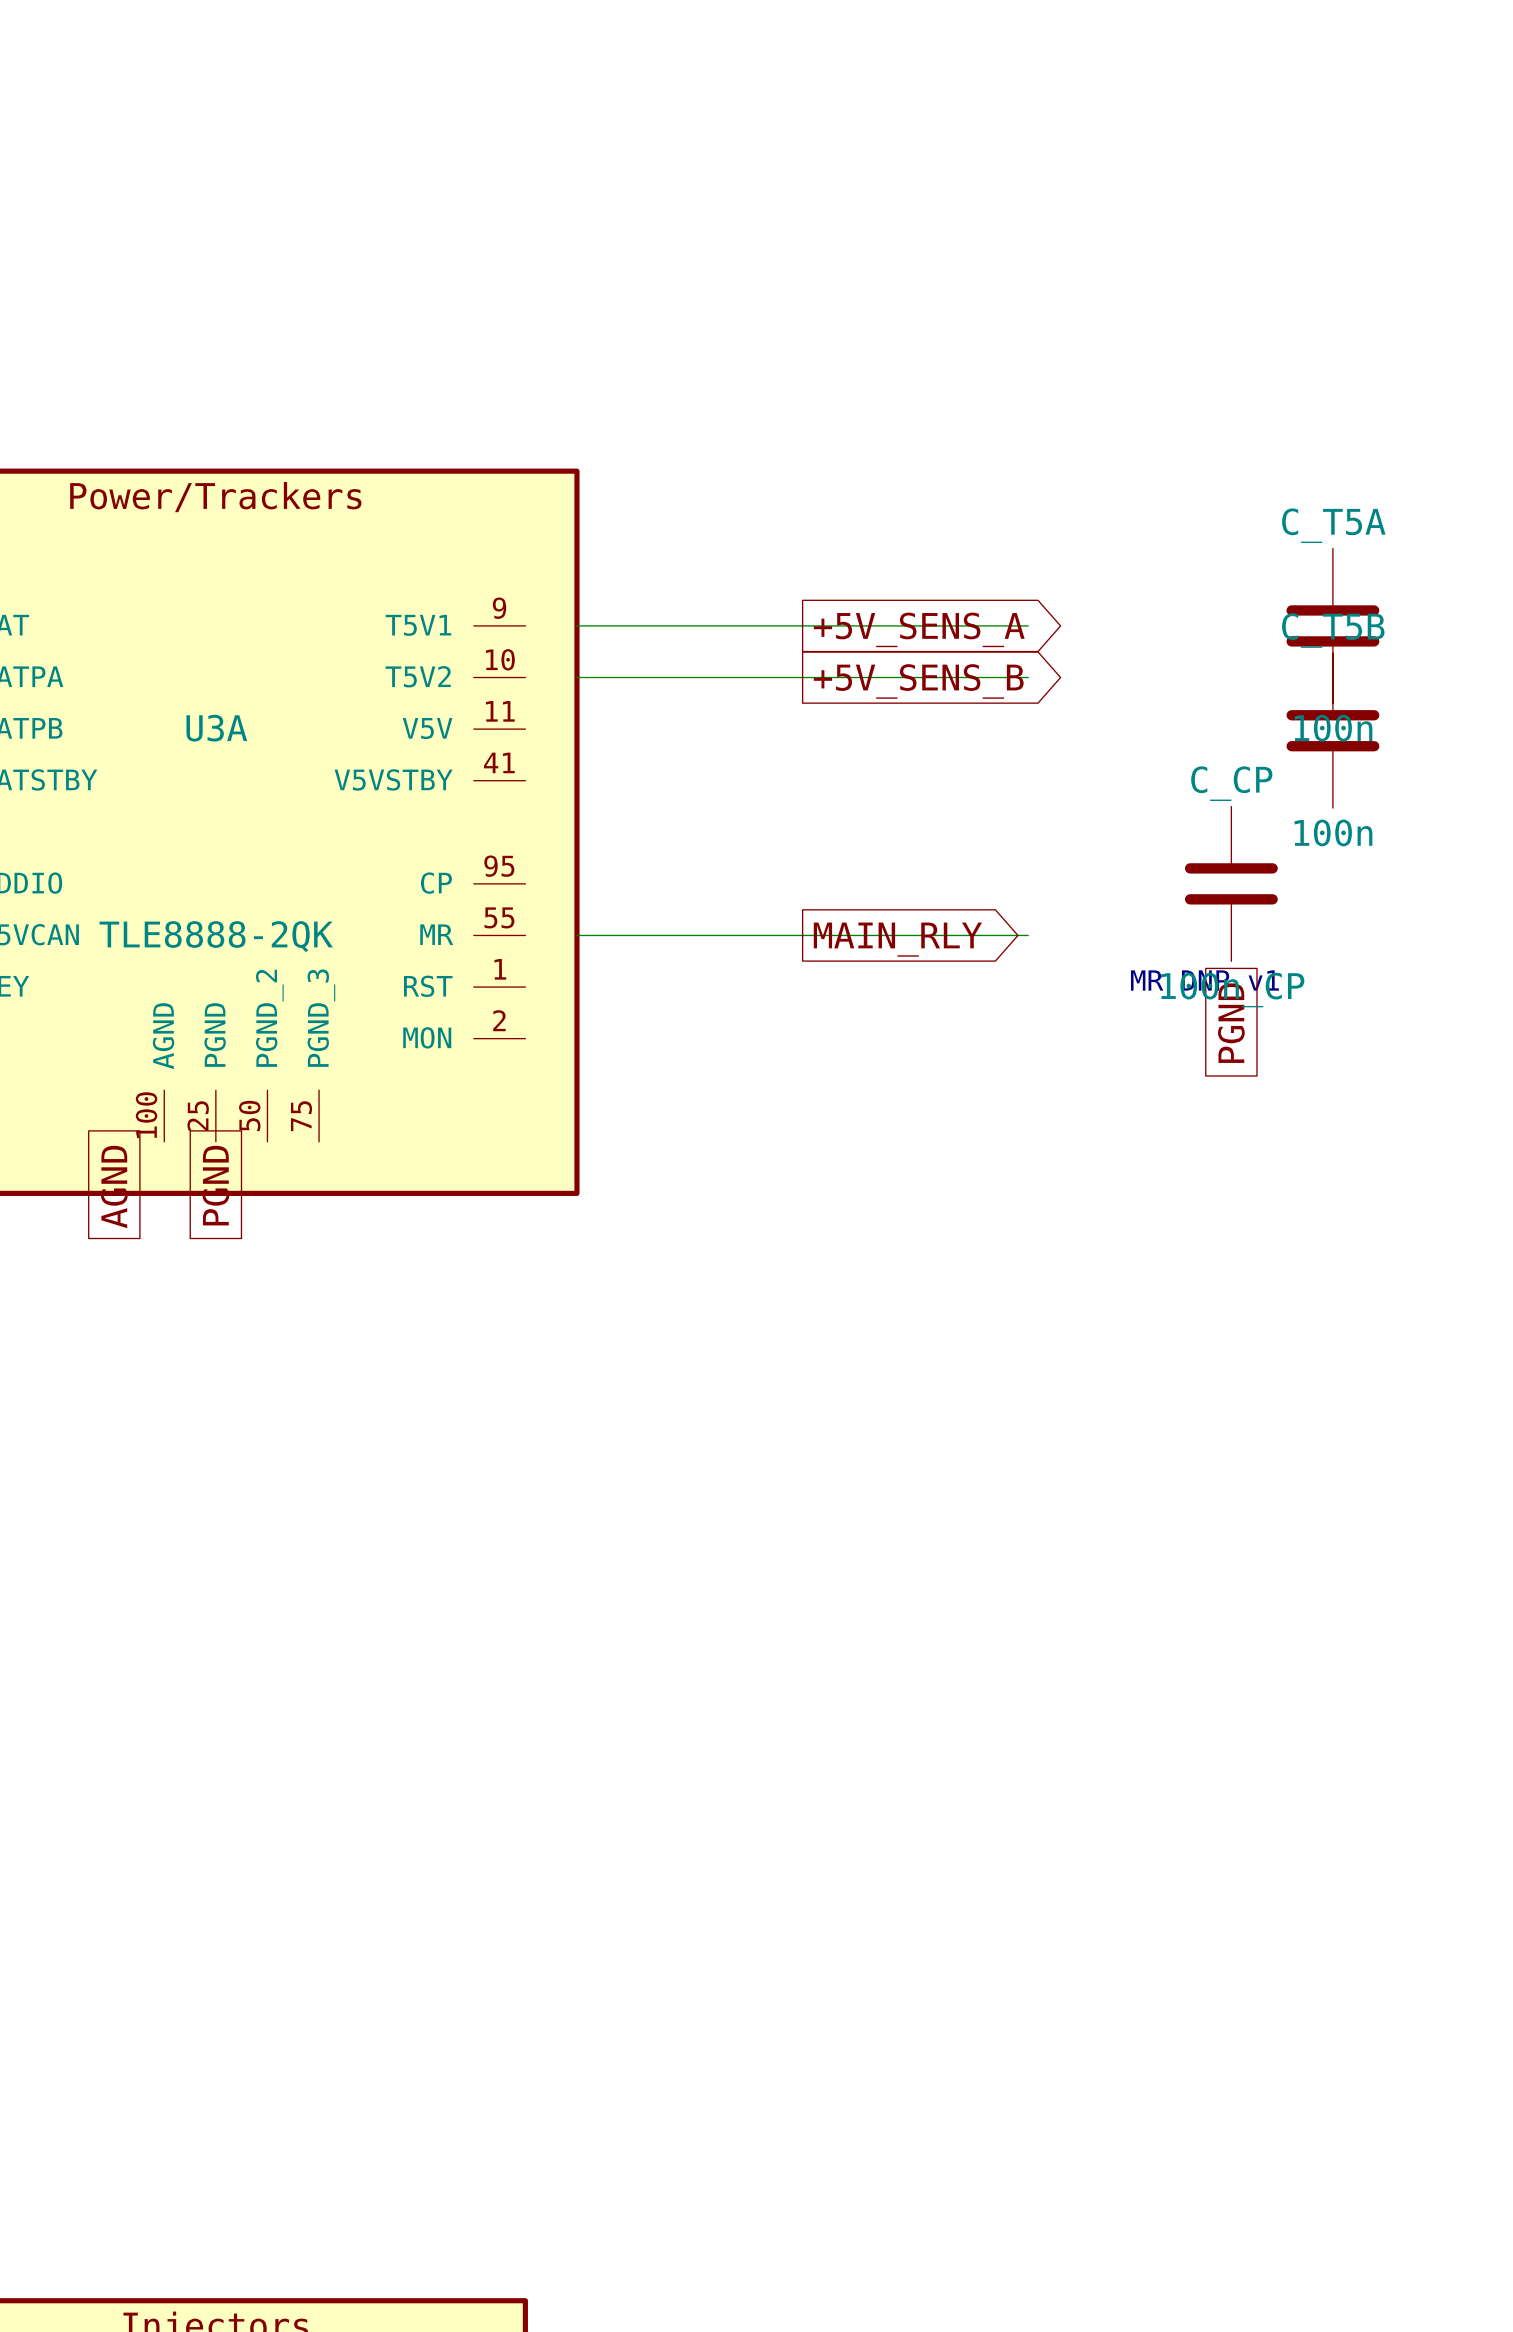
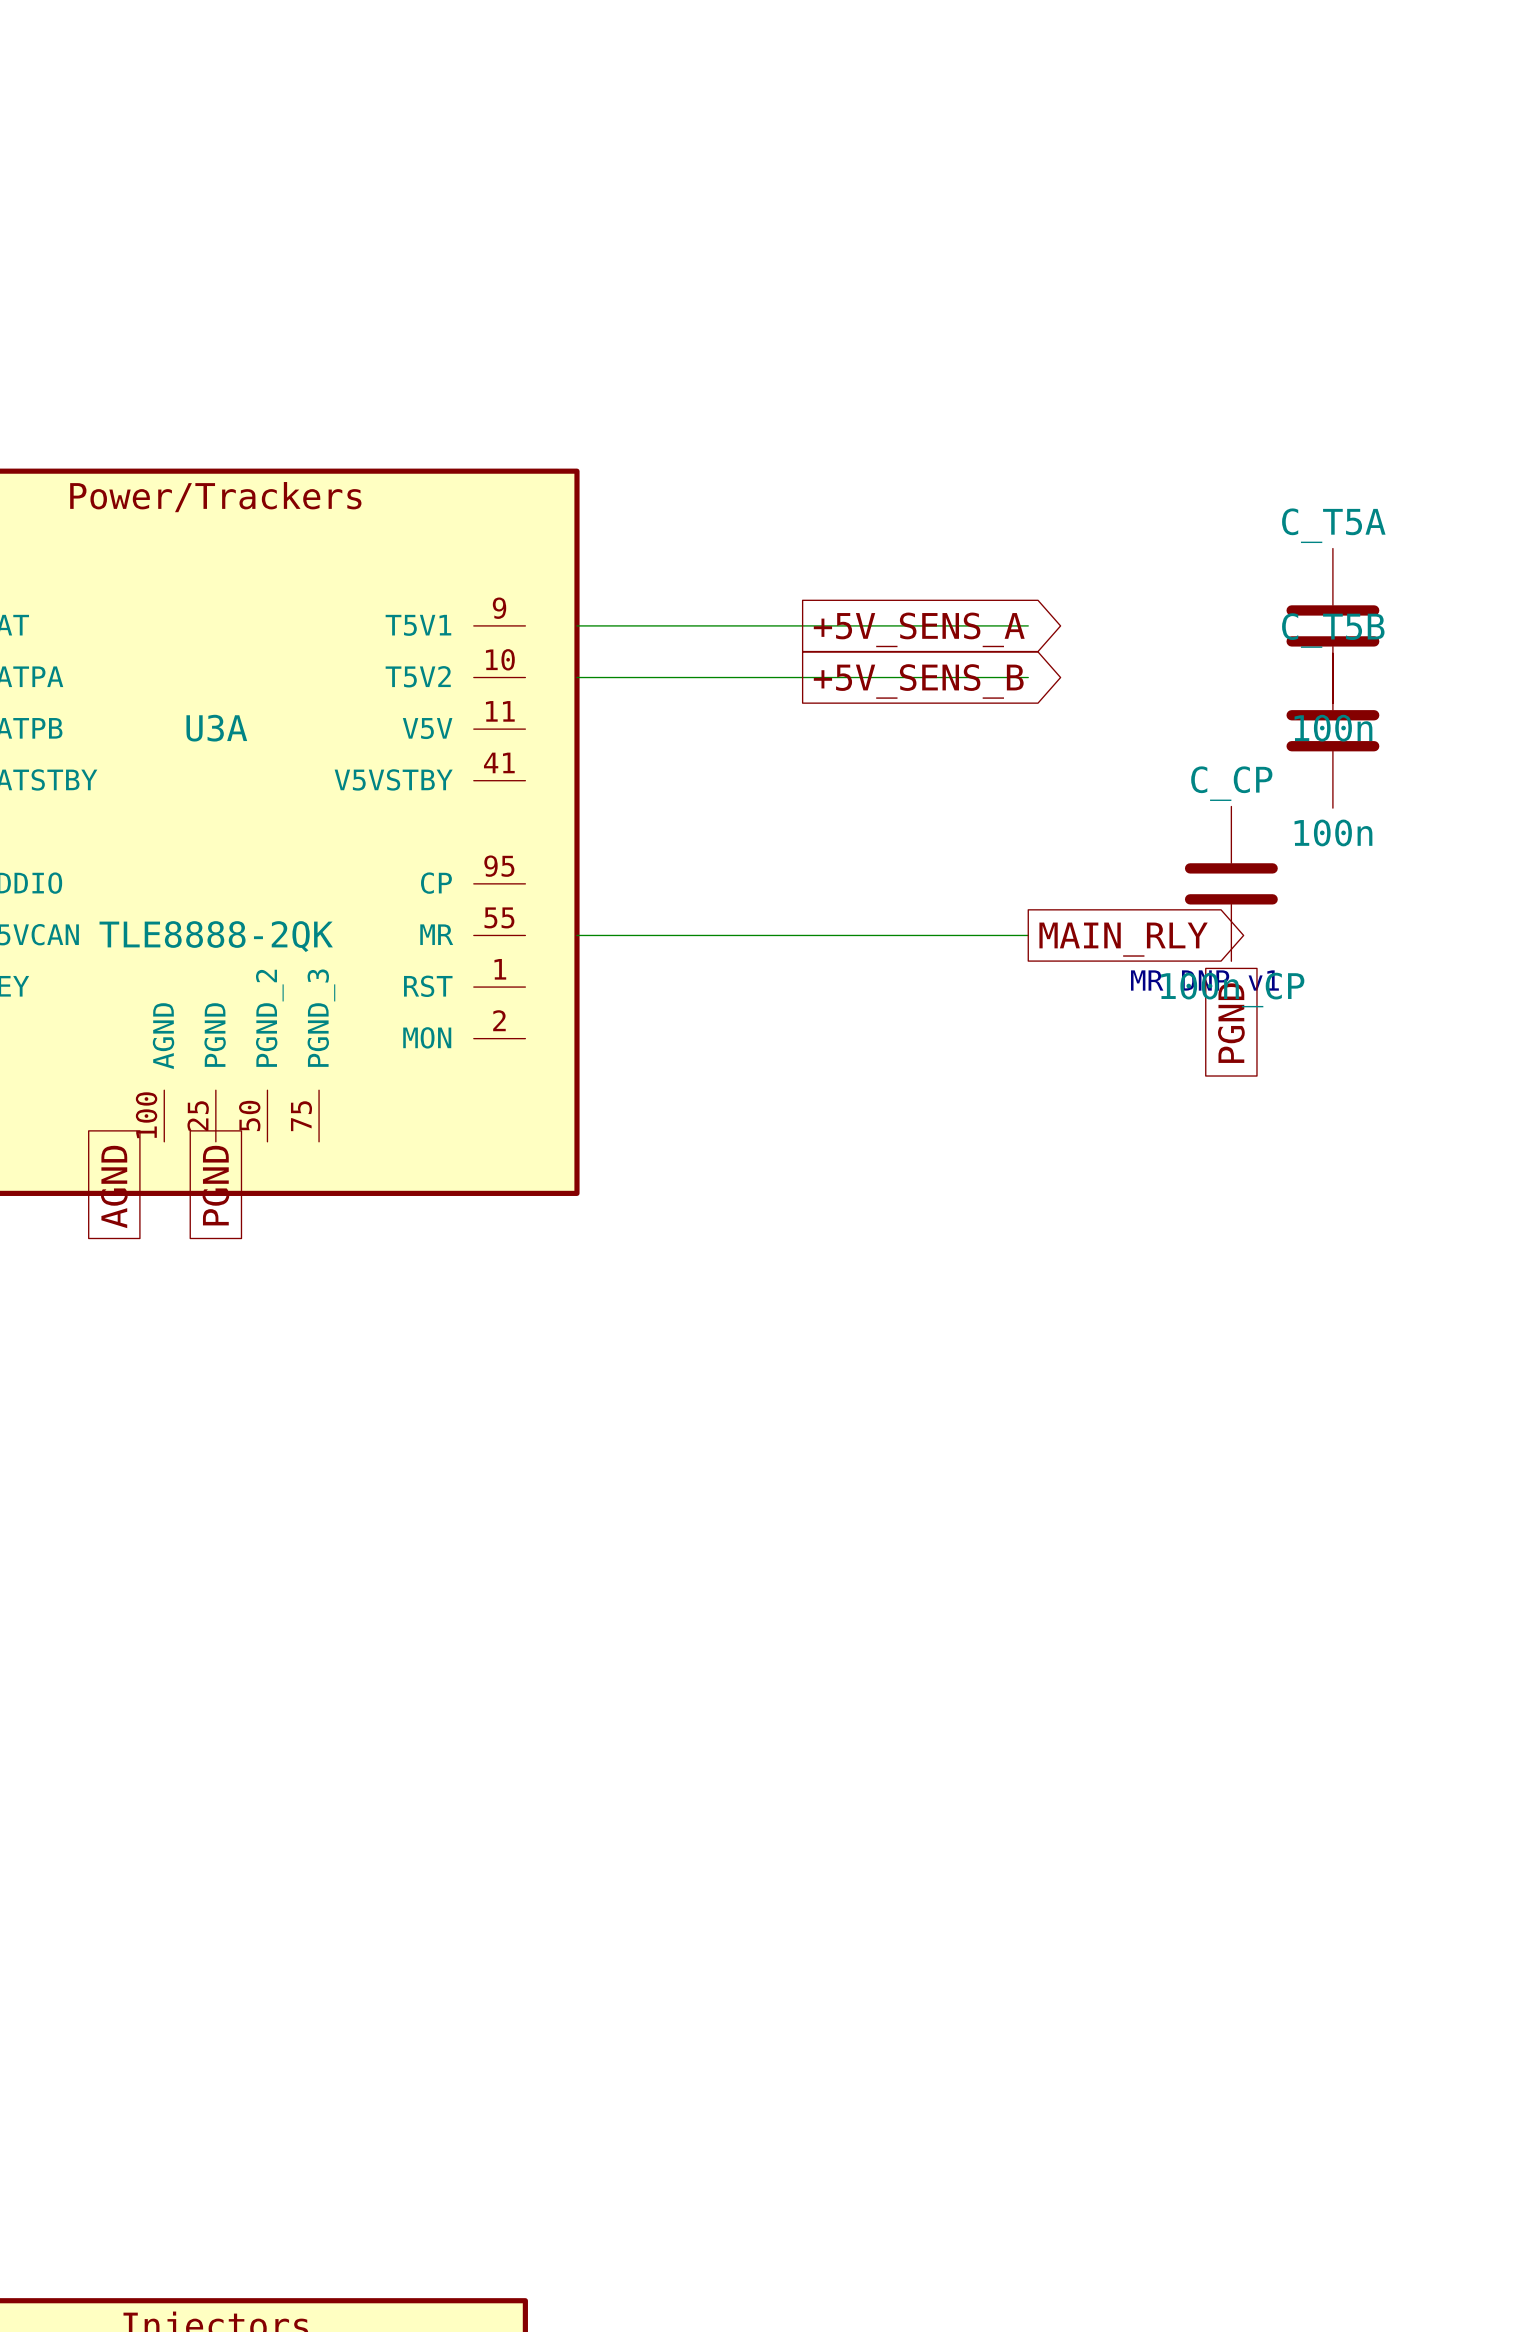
global label position: MAIN_RLY (897, 939) -> MAIN_RLY (1123, 939)

